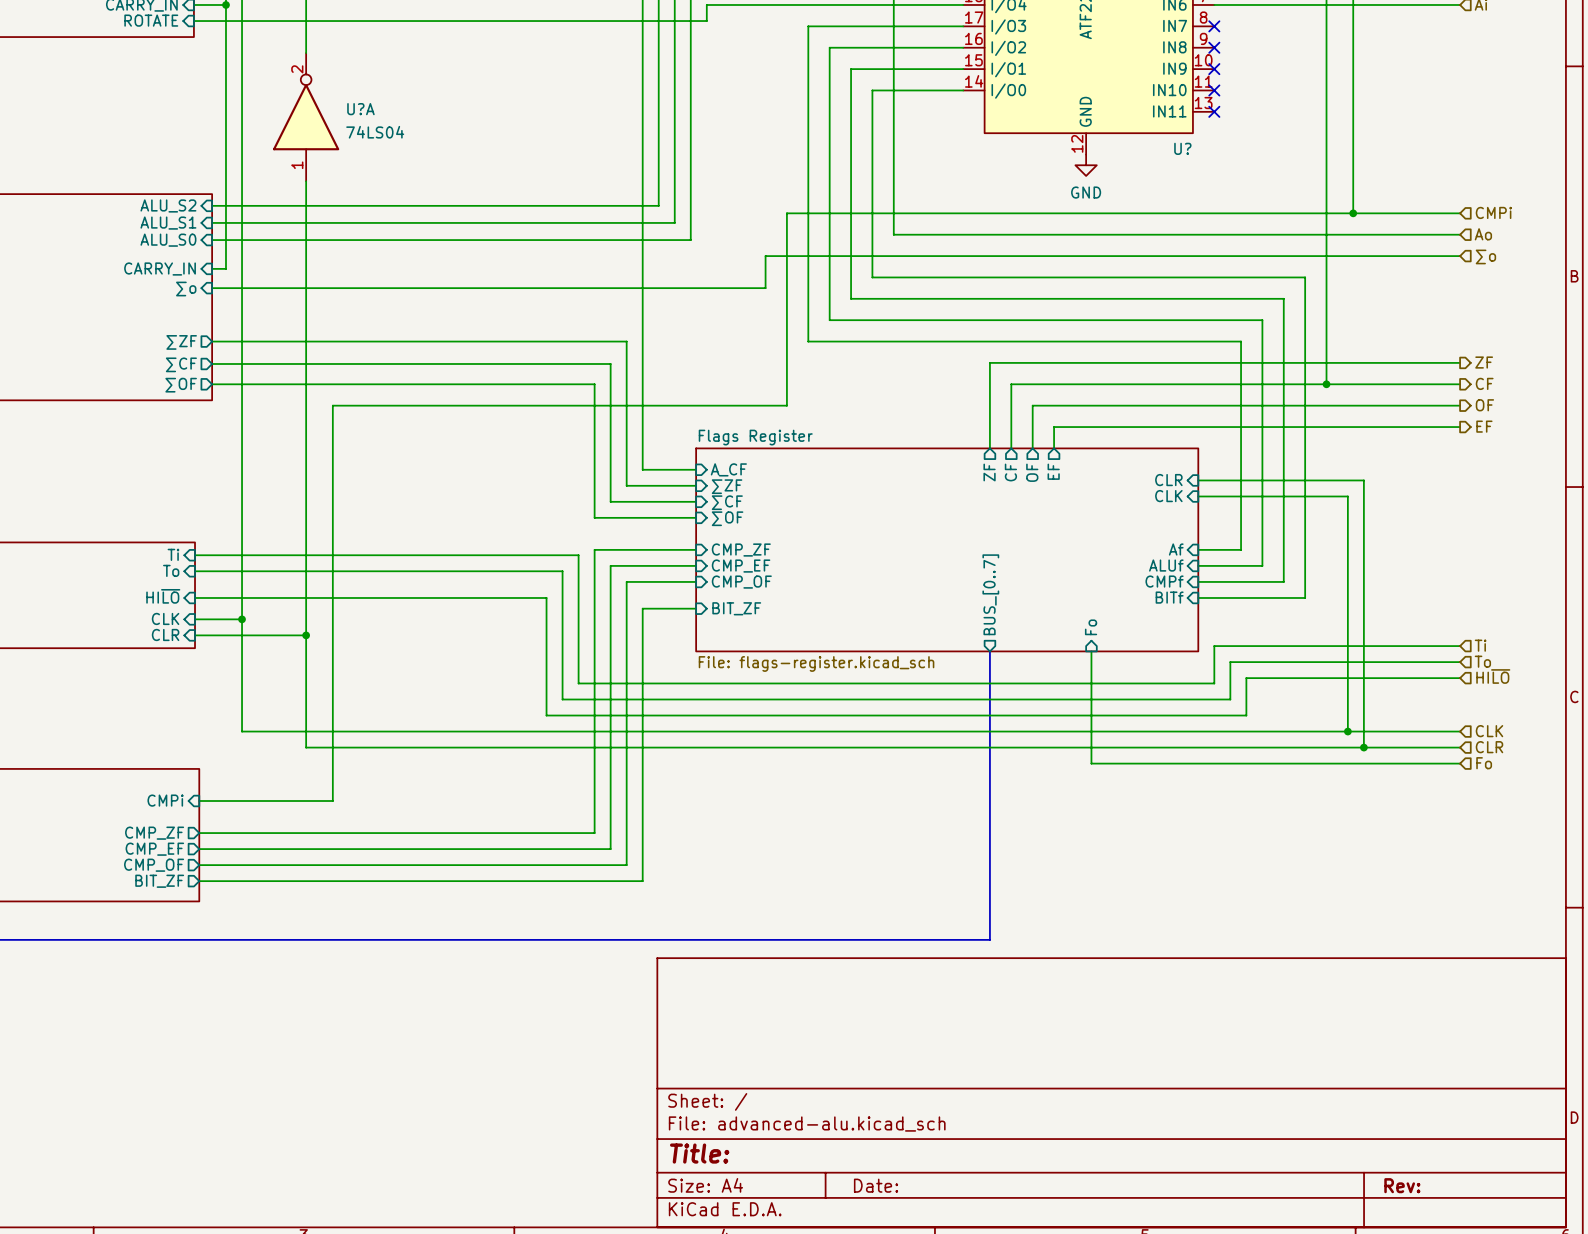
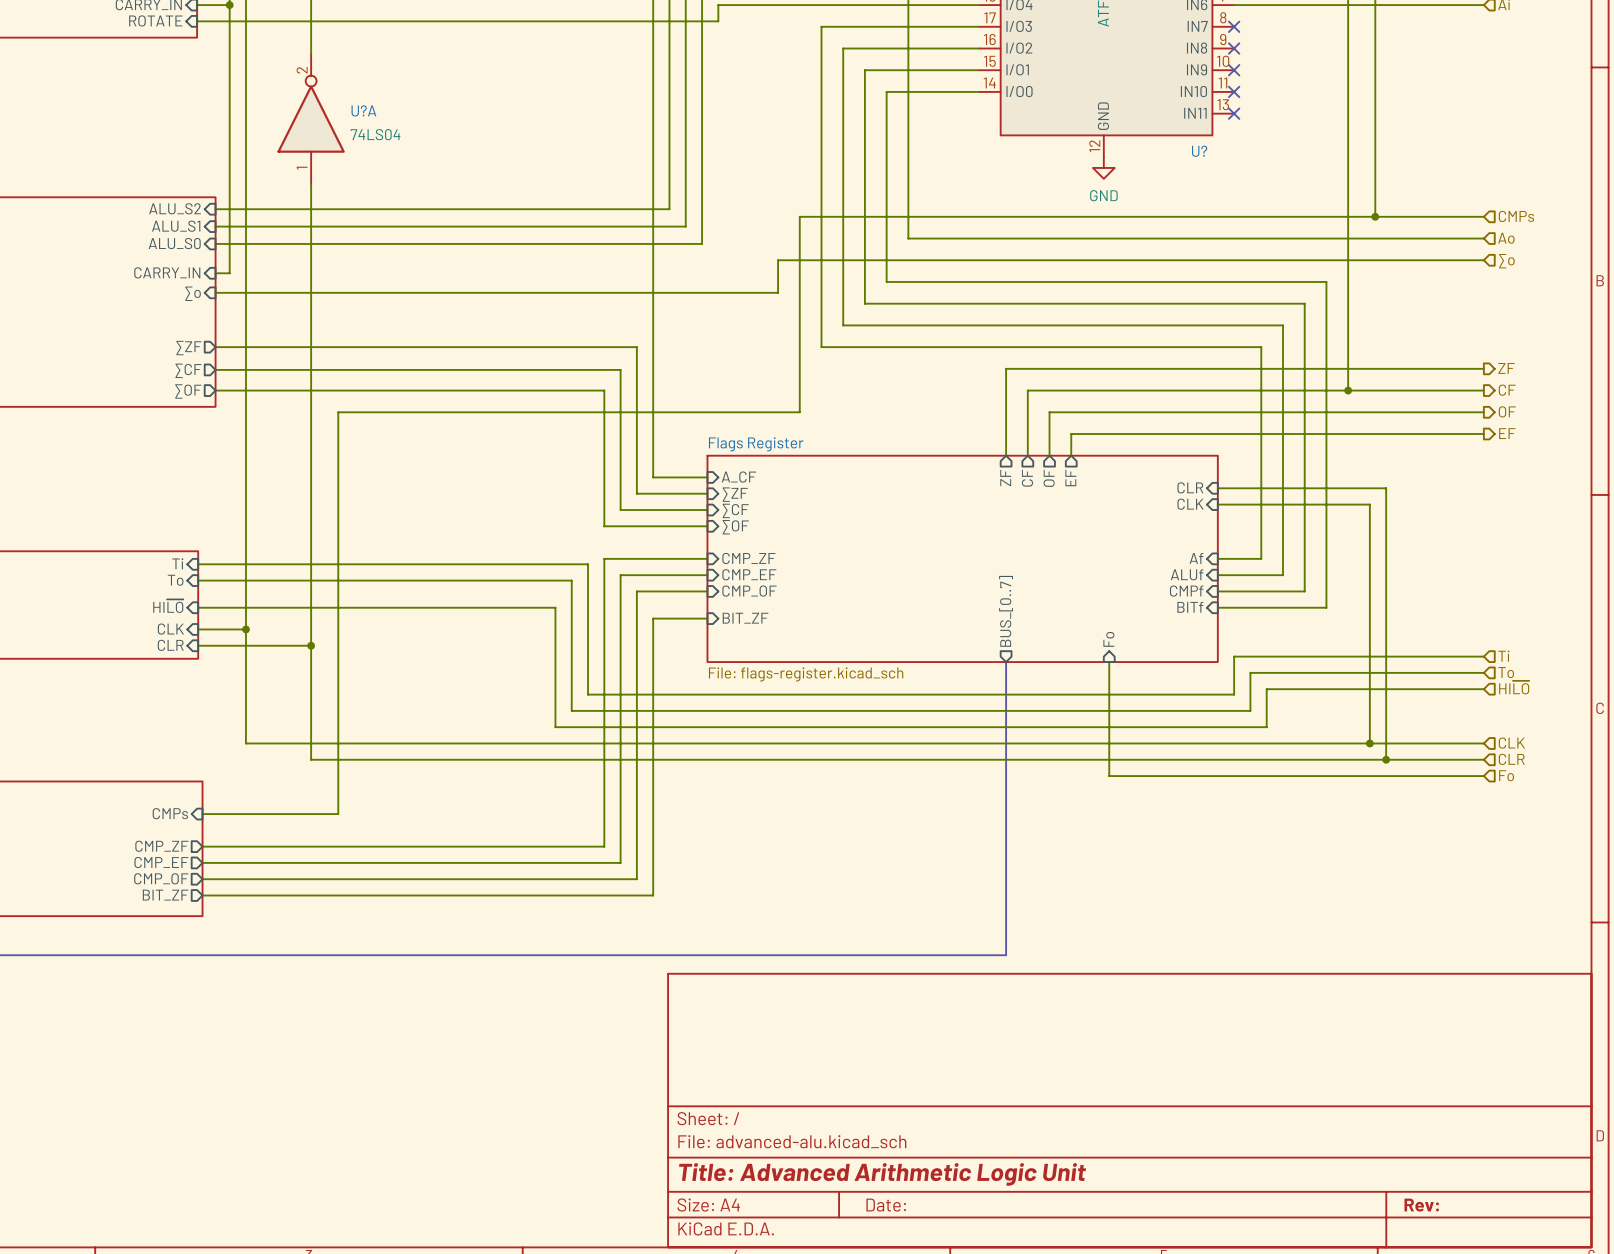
hierarchical label: CMPi (1493, 212) -> CMPs (1516, 216)
sheet pin: CMPi (165, 800) -> CMPs (170, 813)
title block: Title: (699, 1153) -> Title: Advanced Arithmetic Logic Unit (882, 1174)

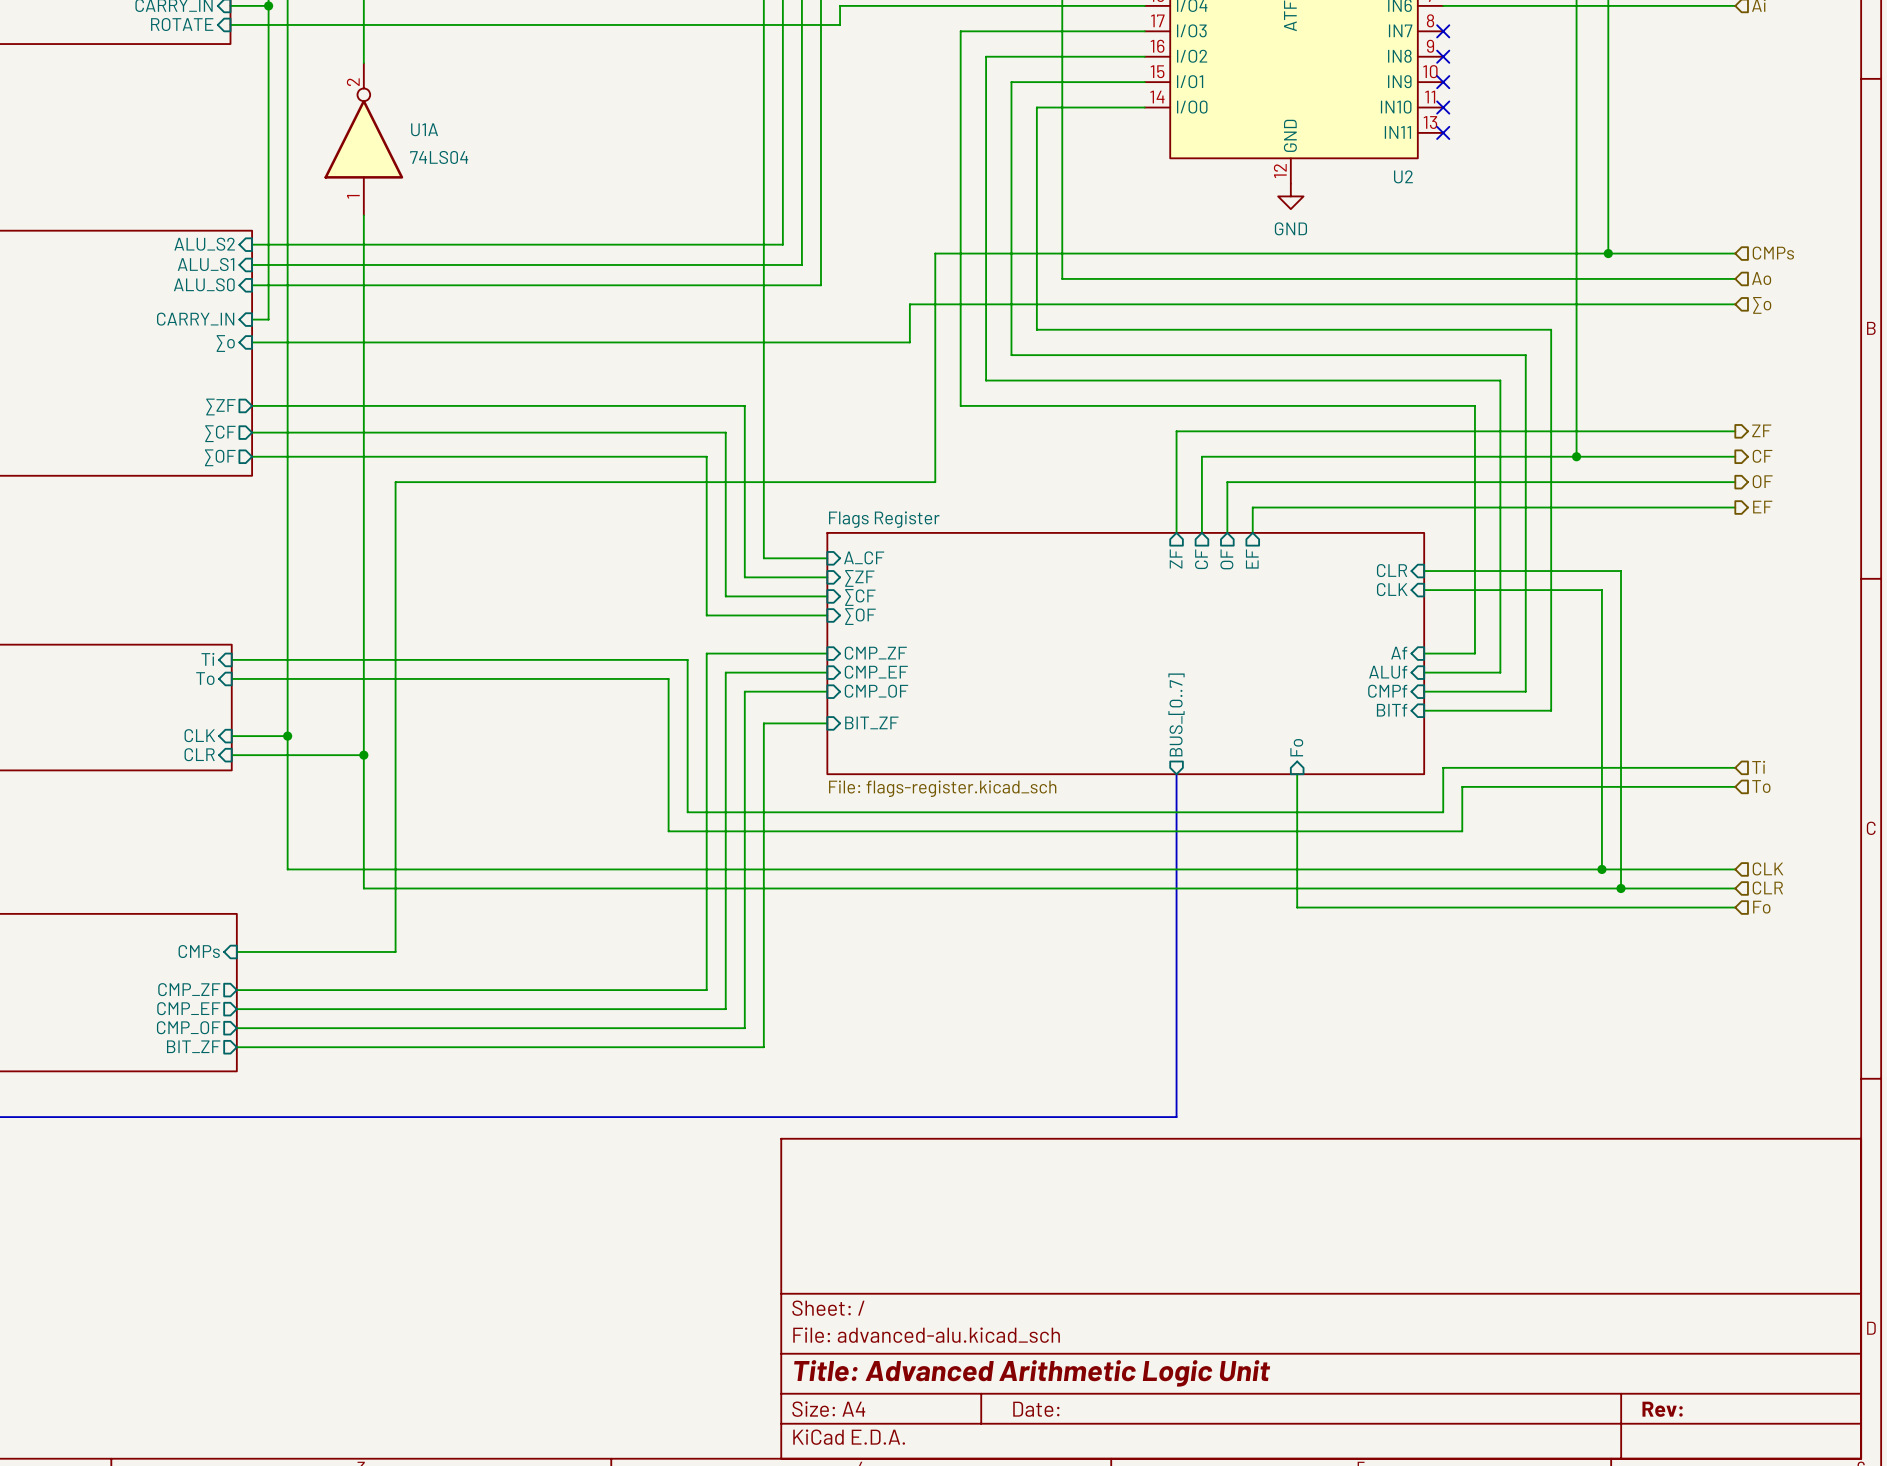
U?A name: U?A (363, 110) -> U1A (424, 129)
U? name: U? (1199, 151) -> U2 (1403, 176)
sheet pin: HI~{LO} (168, 606) -> none
wire: (198, 607) (555, 607) (555, 727) (1266, 727) (1266, 689) (1483, 689) -> none
hierarchical label: HI~{LO} (1514, 687) -> none

